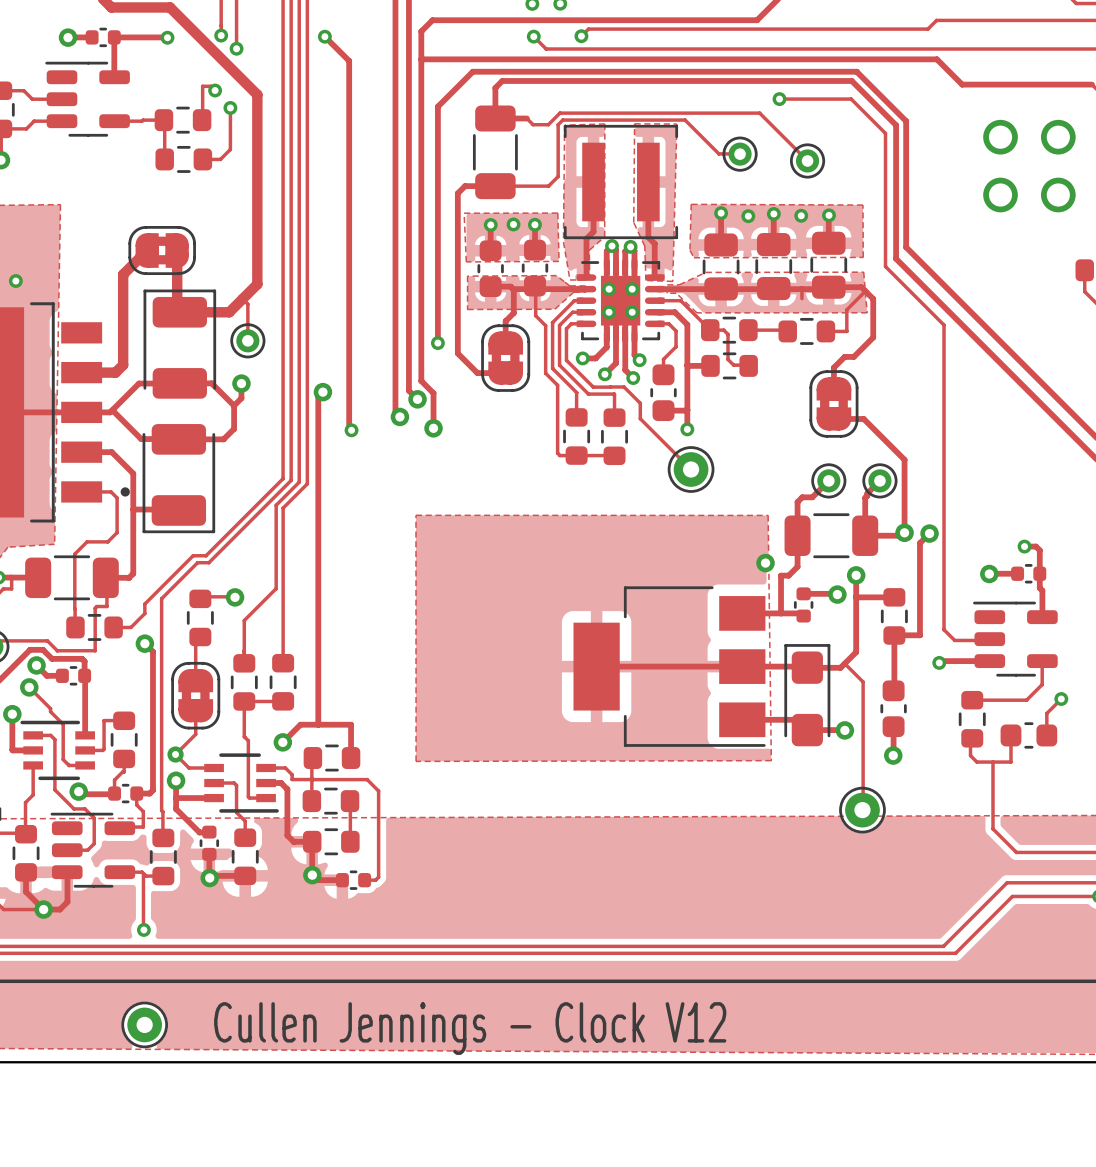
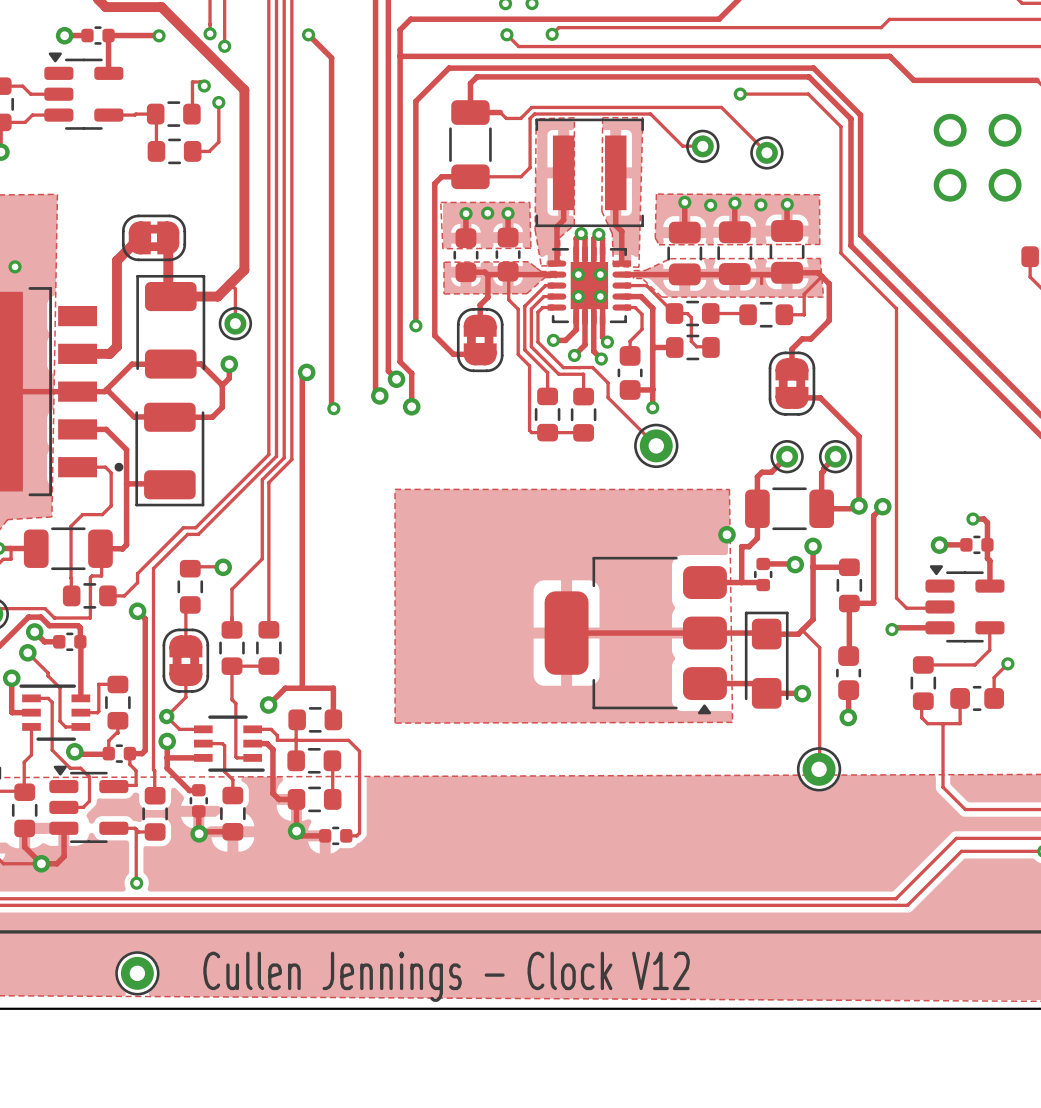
part footprint: [45, 61, 130, 137] -> [44, 52, 124, 130]
part footprint: [573, 586, 766, 747] -> [544, 556, 727, 715]
part footprint: [973, 601, 1058, 677] -> [925, 565, 1005, 643]
part footprint: [50, 812, 136, 888] -> [49, 765, 129, 843]

